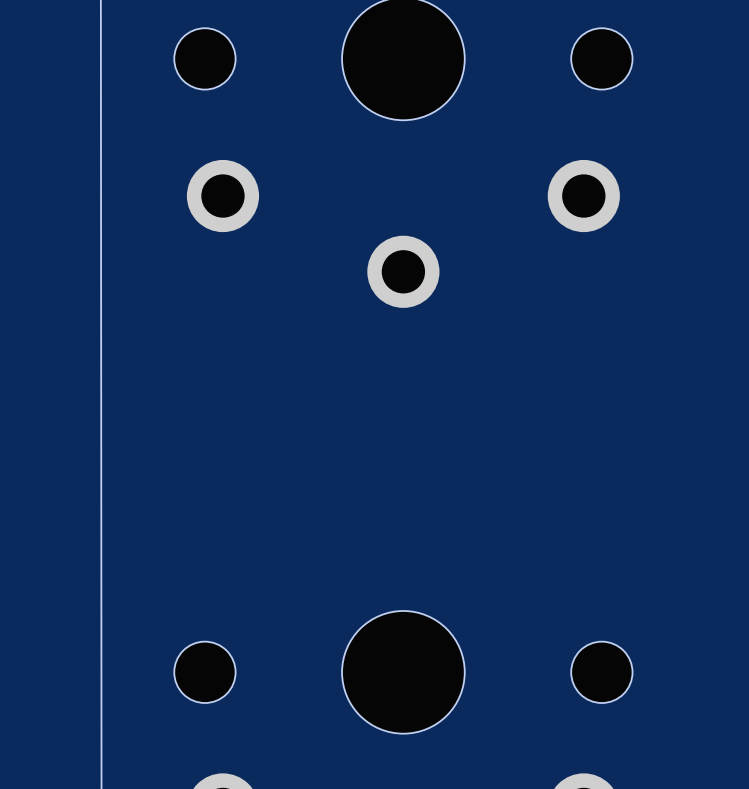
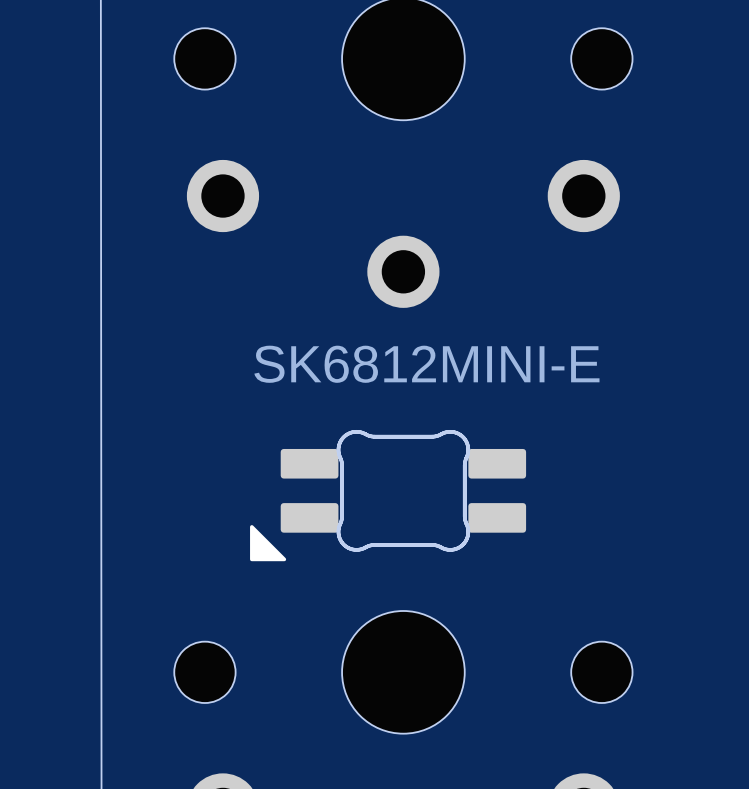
part: none -> SK6812MINI-E (403, 490)
part: none -> (388, 495)

